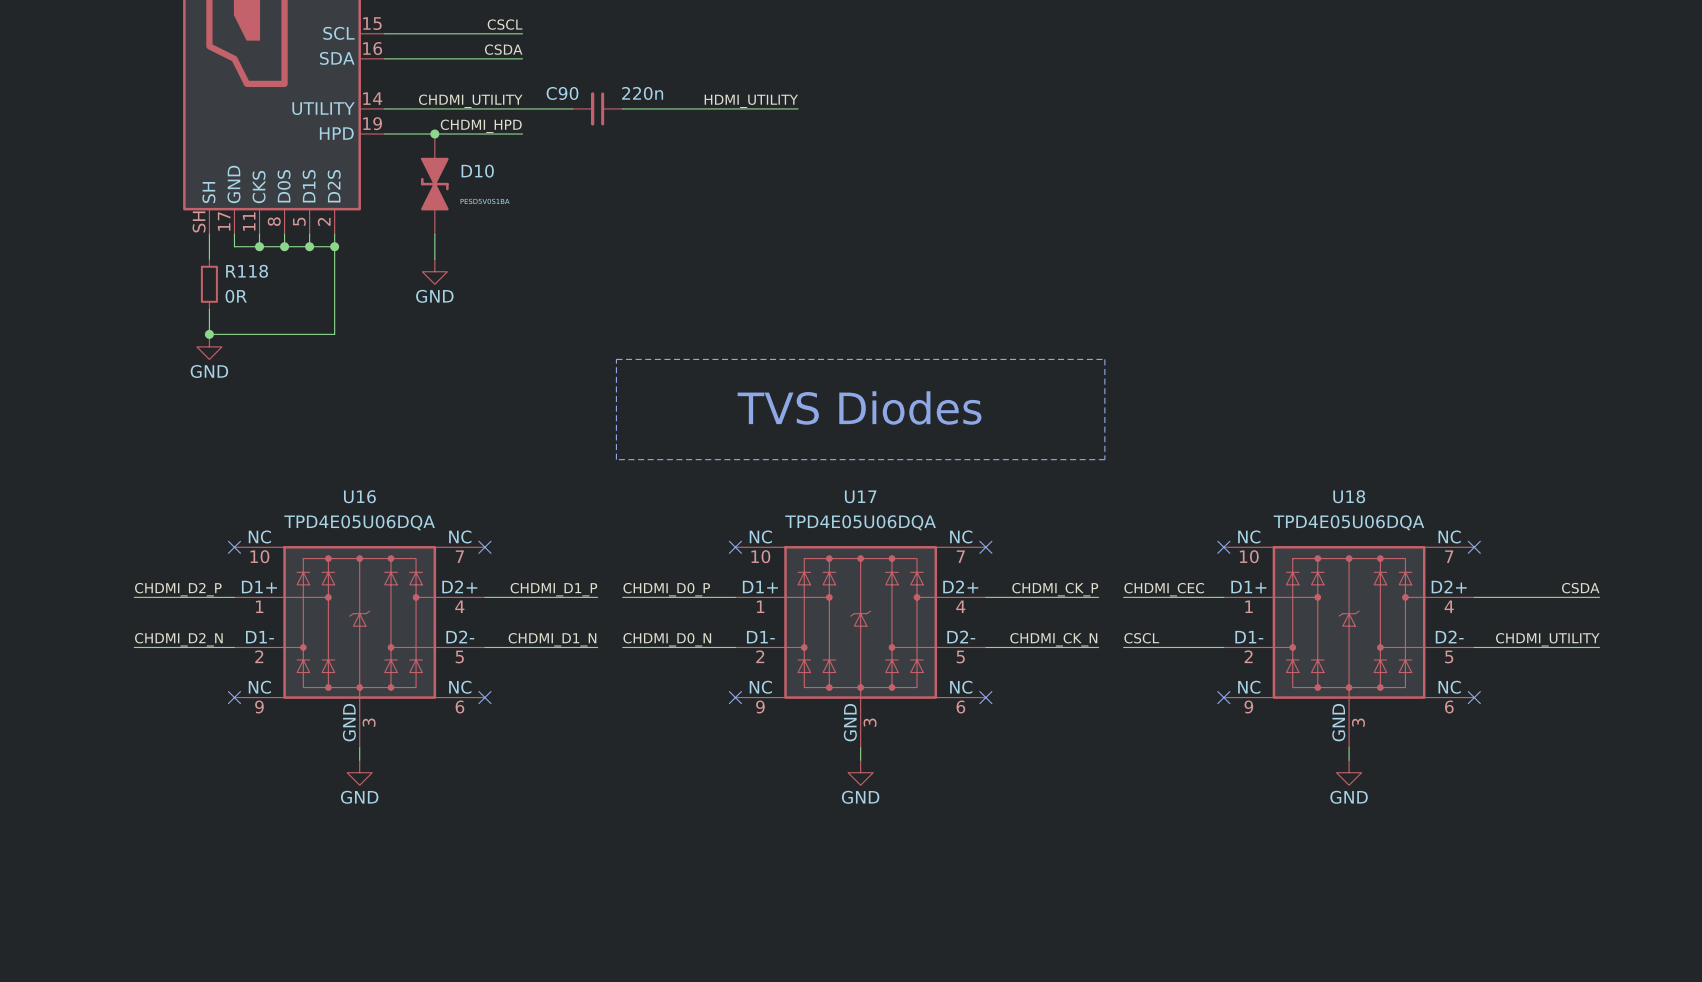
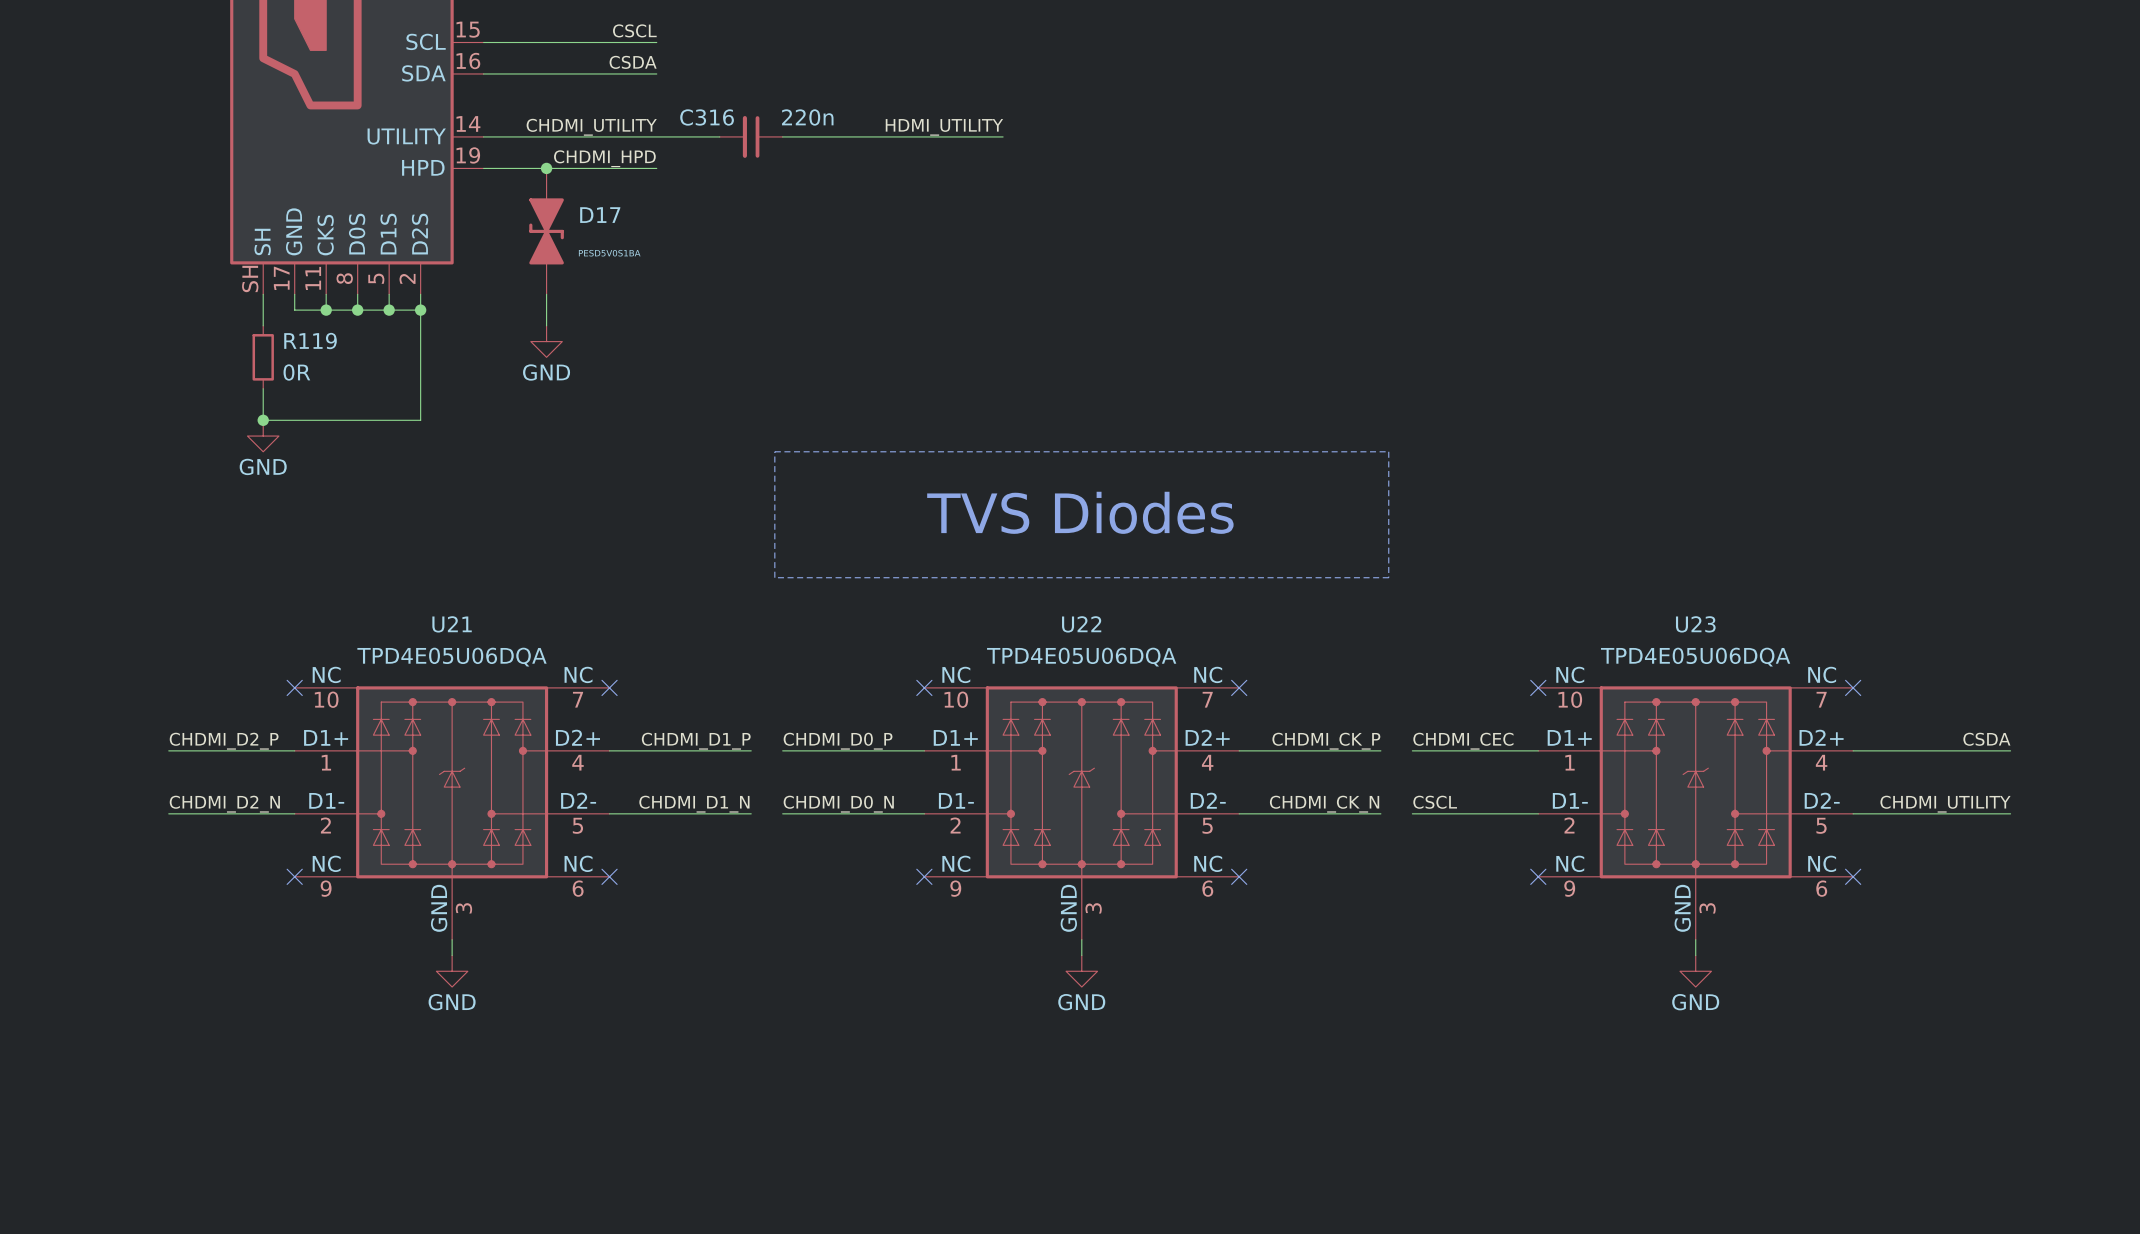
C90 name: C90 (562, 93) -> C316 (707, 117)
D10 name: D10 (477, 171) -> D17 (600, 215)
R118 name: R118 (247, 271) -> R119 (310, 341)
U16 name: U16 (359, 496) -> U21 (452, 624)
U17 name: U17 (860, 496) -> U22 (1081, 624)
U18 name: U18 (1349, 496) -> U23 (1695, 624)

